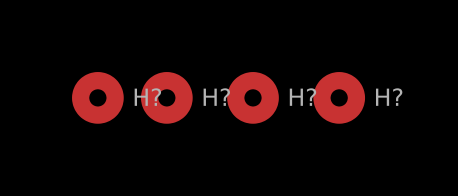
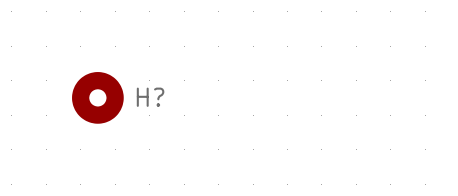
H?: (166, 97) -> none
H?: (253, 97) -> none
H?: (339, 97) -> none

